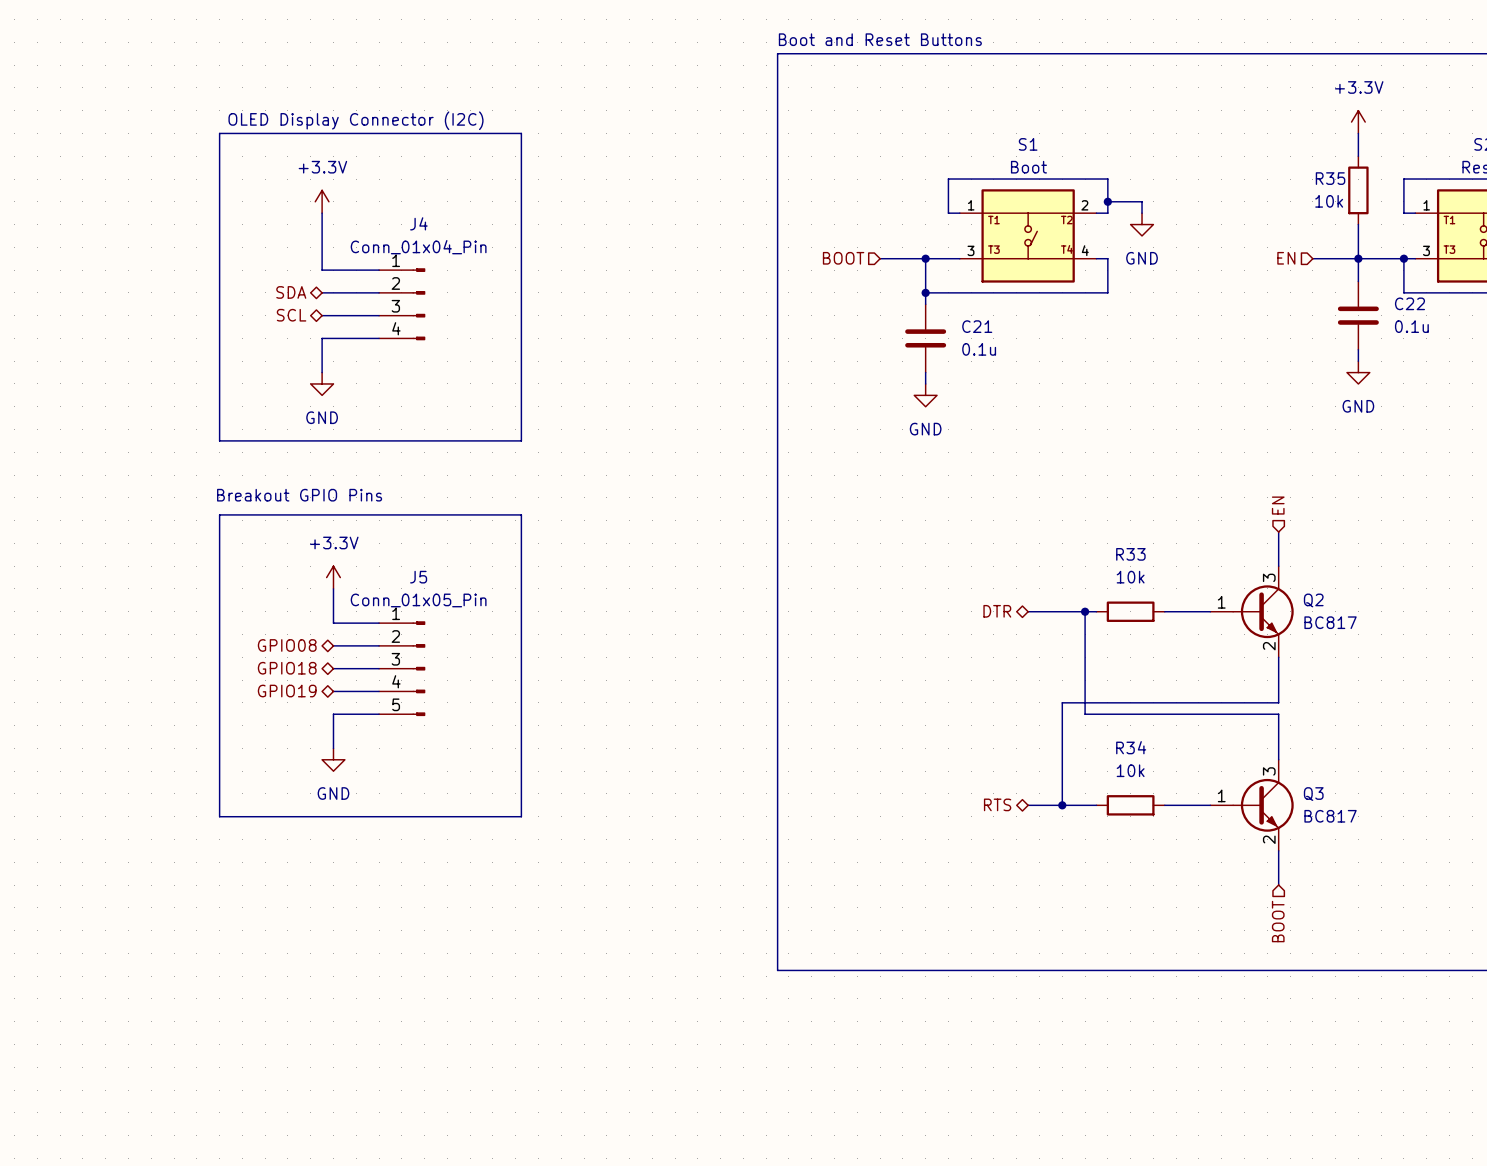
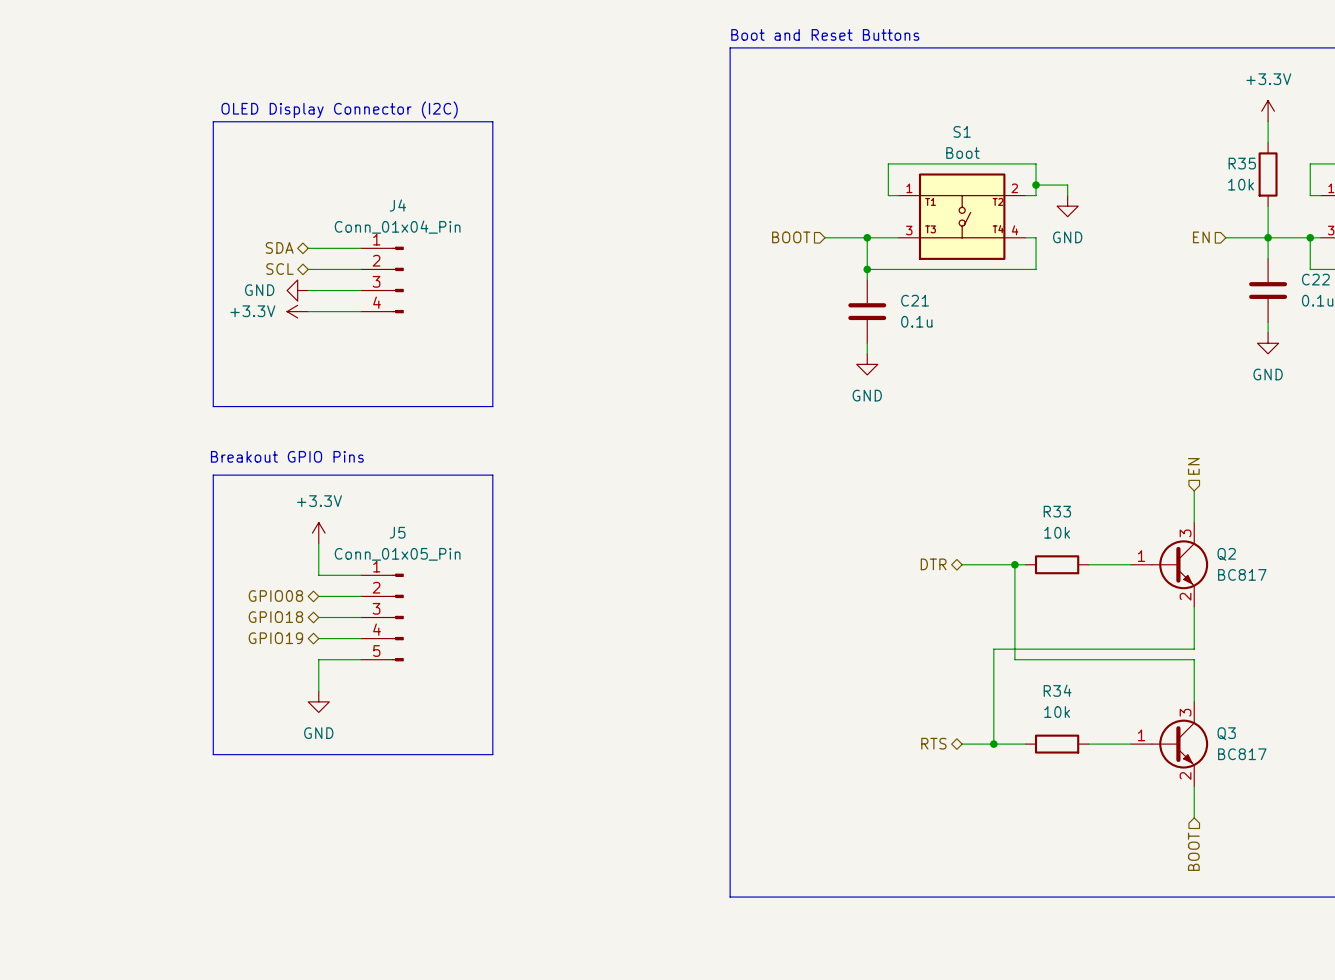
power symbol text position: +3.3V (322, 167) -> +3.3V (252, 311)
power symbol rotation: 0° (322, 201) -> 90° counterclockwise (297, 311)
power symbol position: +3.3V (322, 201) -> +3.3V (297, 311)
wire: (322, 213) (322, 270) -> none
hierarchical label: none -> SDA (279, 247)
hierarchical label: SDA (291, 292) -> SCL (279, 269)
hierarchical label: SCL (291, 315) -> none
wire: (322, 338) (322, 372) -> none
power symbol rotation: 0° (322, 383) -> 90° clockwise (297, 290)
power symbol position: GND (322, 383) -> GND (297, 290)

